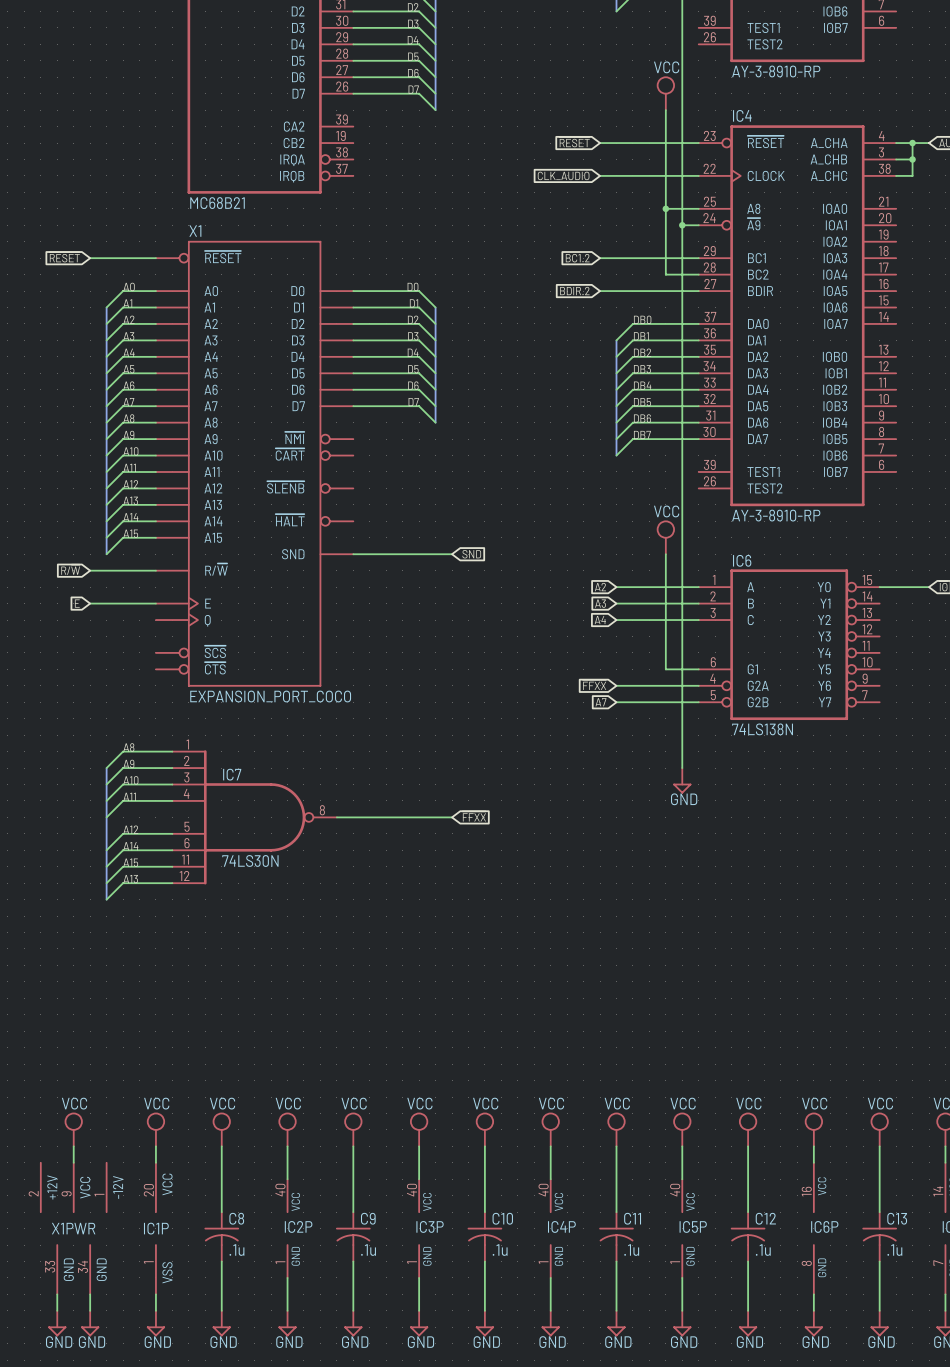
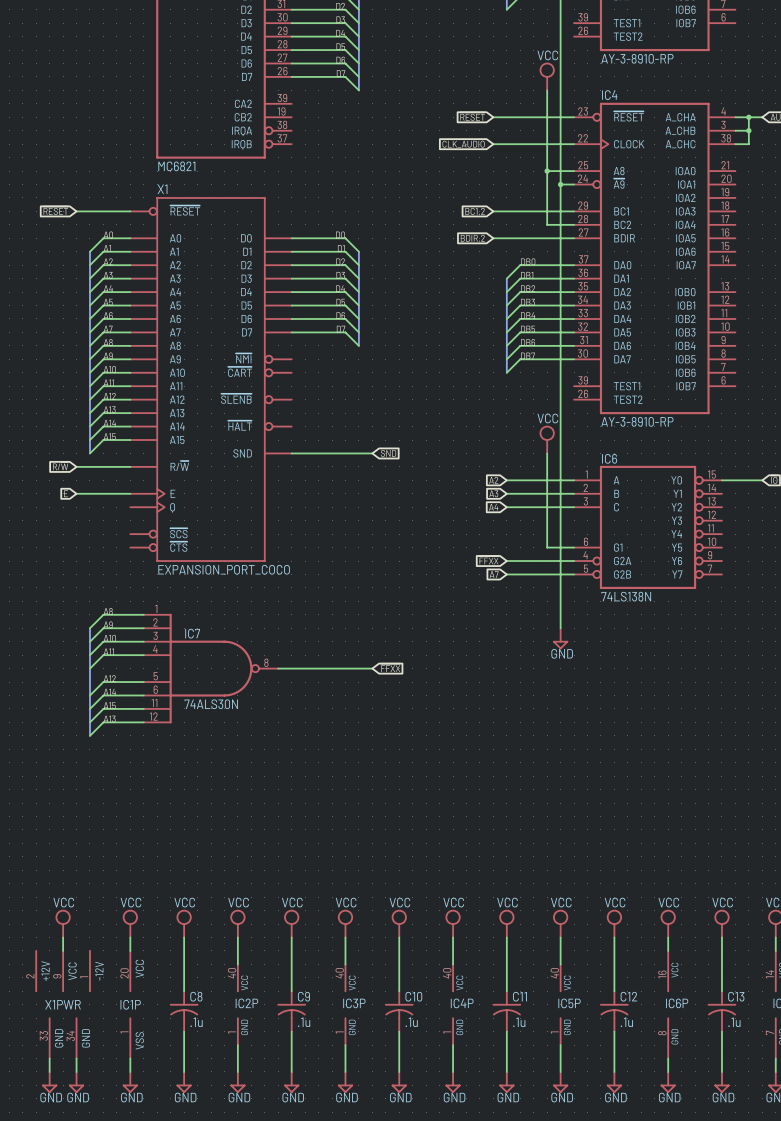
part value: MC68B21 (217, 203) -> MC6821 (176, 166)
IC7 value: 74LS30N (250, 860) -> 74ALS30N (211, 704)

